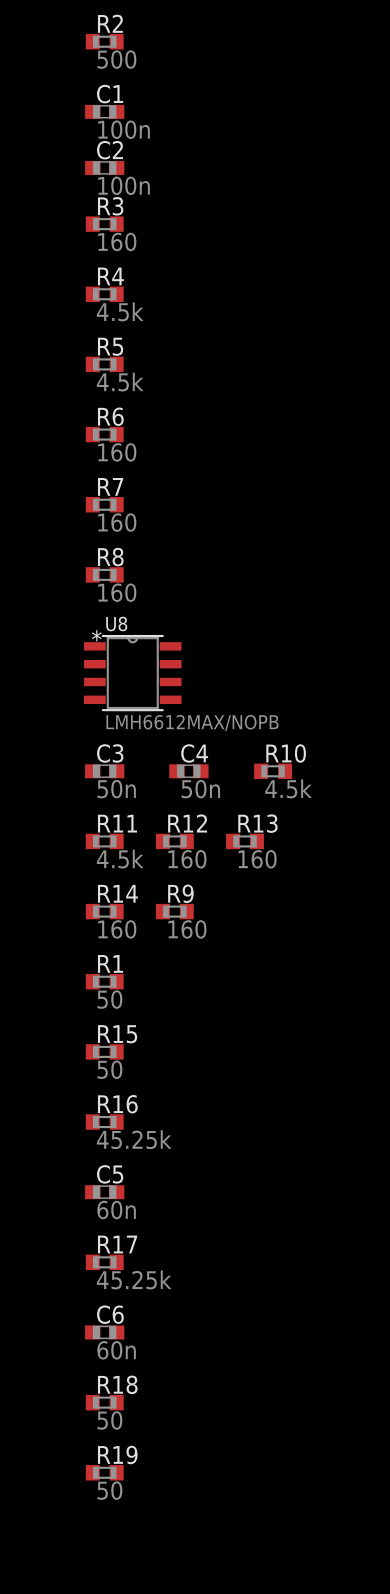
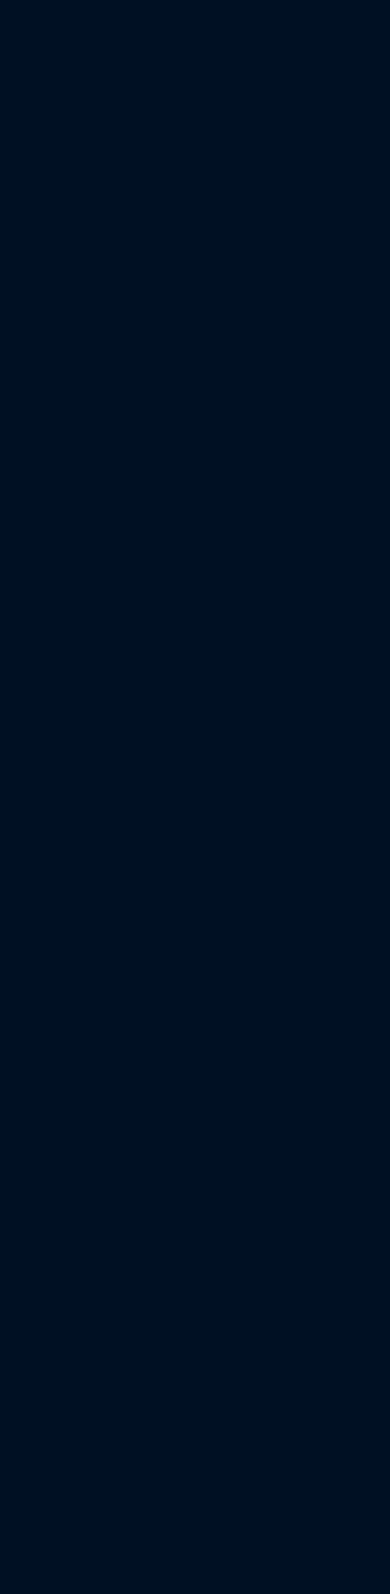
R2: 500 (104, 41) -> none
C1: 100n (104, 111) -> none
C2: 100n (104, 168) -> none
R3: 160 (104, 224) -> none
R4: 4.5k (104, 294) -> none
R5: 4.5k (104, 364) -> none
R6: 160 (104, 434) -> none
R7: 160 (104, 504) -> none
R8: 160 (104, 574) -> none
U8: LMH6612MAX/NOPB (132, 673) -> none
C3: 50n (104, 771) -> none
C4: 50n (188, 771) -> none
R10: 4.5k (273, 771) -> none
R11: 4.5k (104, 841) -> none
R12: 160 (174, 841) -> none
R13: 160 (245, 841) -> none
R14: 160 (104, 911) -> none
R9: 160 (174, 911) -> none
R1: 50 (104, 981) -> none
R15: 50 (104, 1051) -> none
R16: 45.25k (104, 1122) -> none
C5: 60n (104, 1192) -> none
R17: 45.25k (104, 1262) -> none
C6: 60n (104, 1332) -> none
R18: 50 (104, 1402) -> none
R19: 50 (104, 1472) -> none

